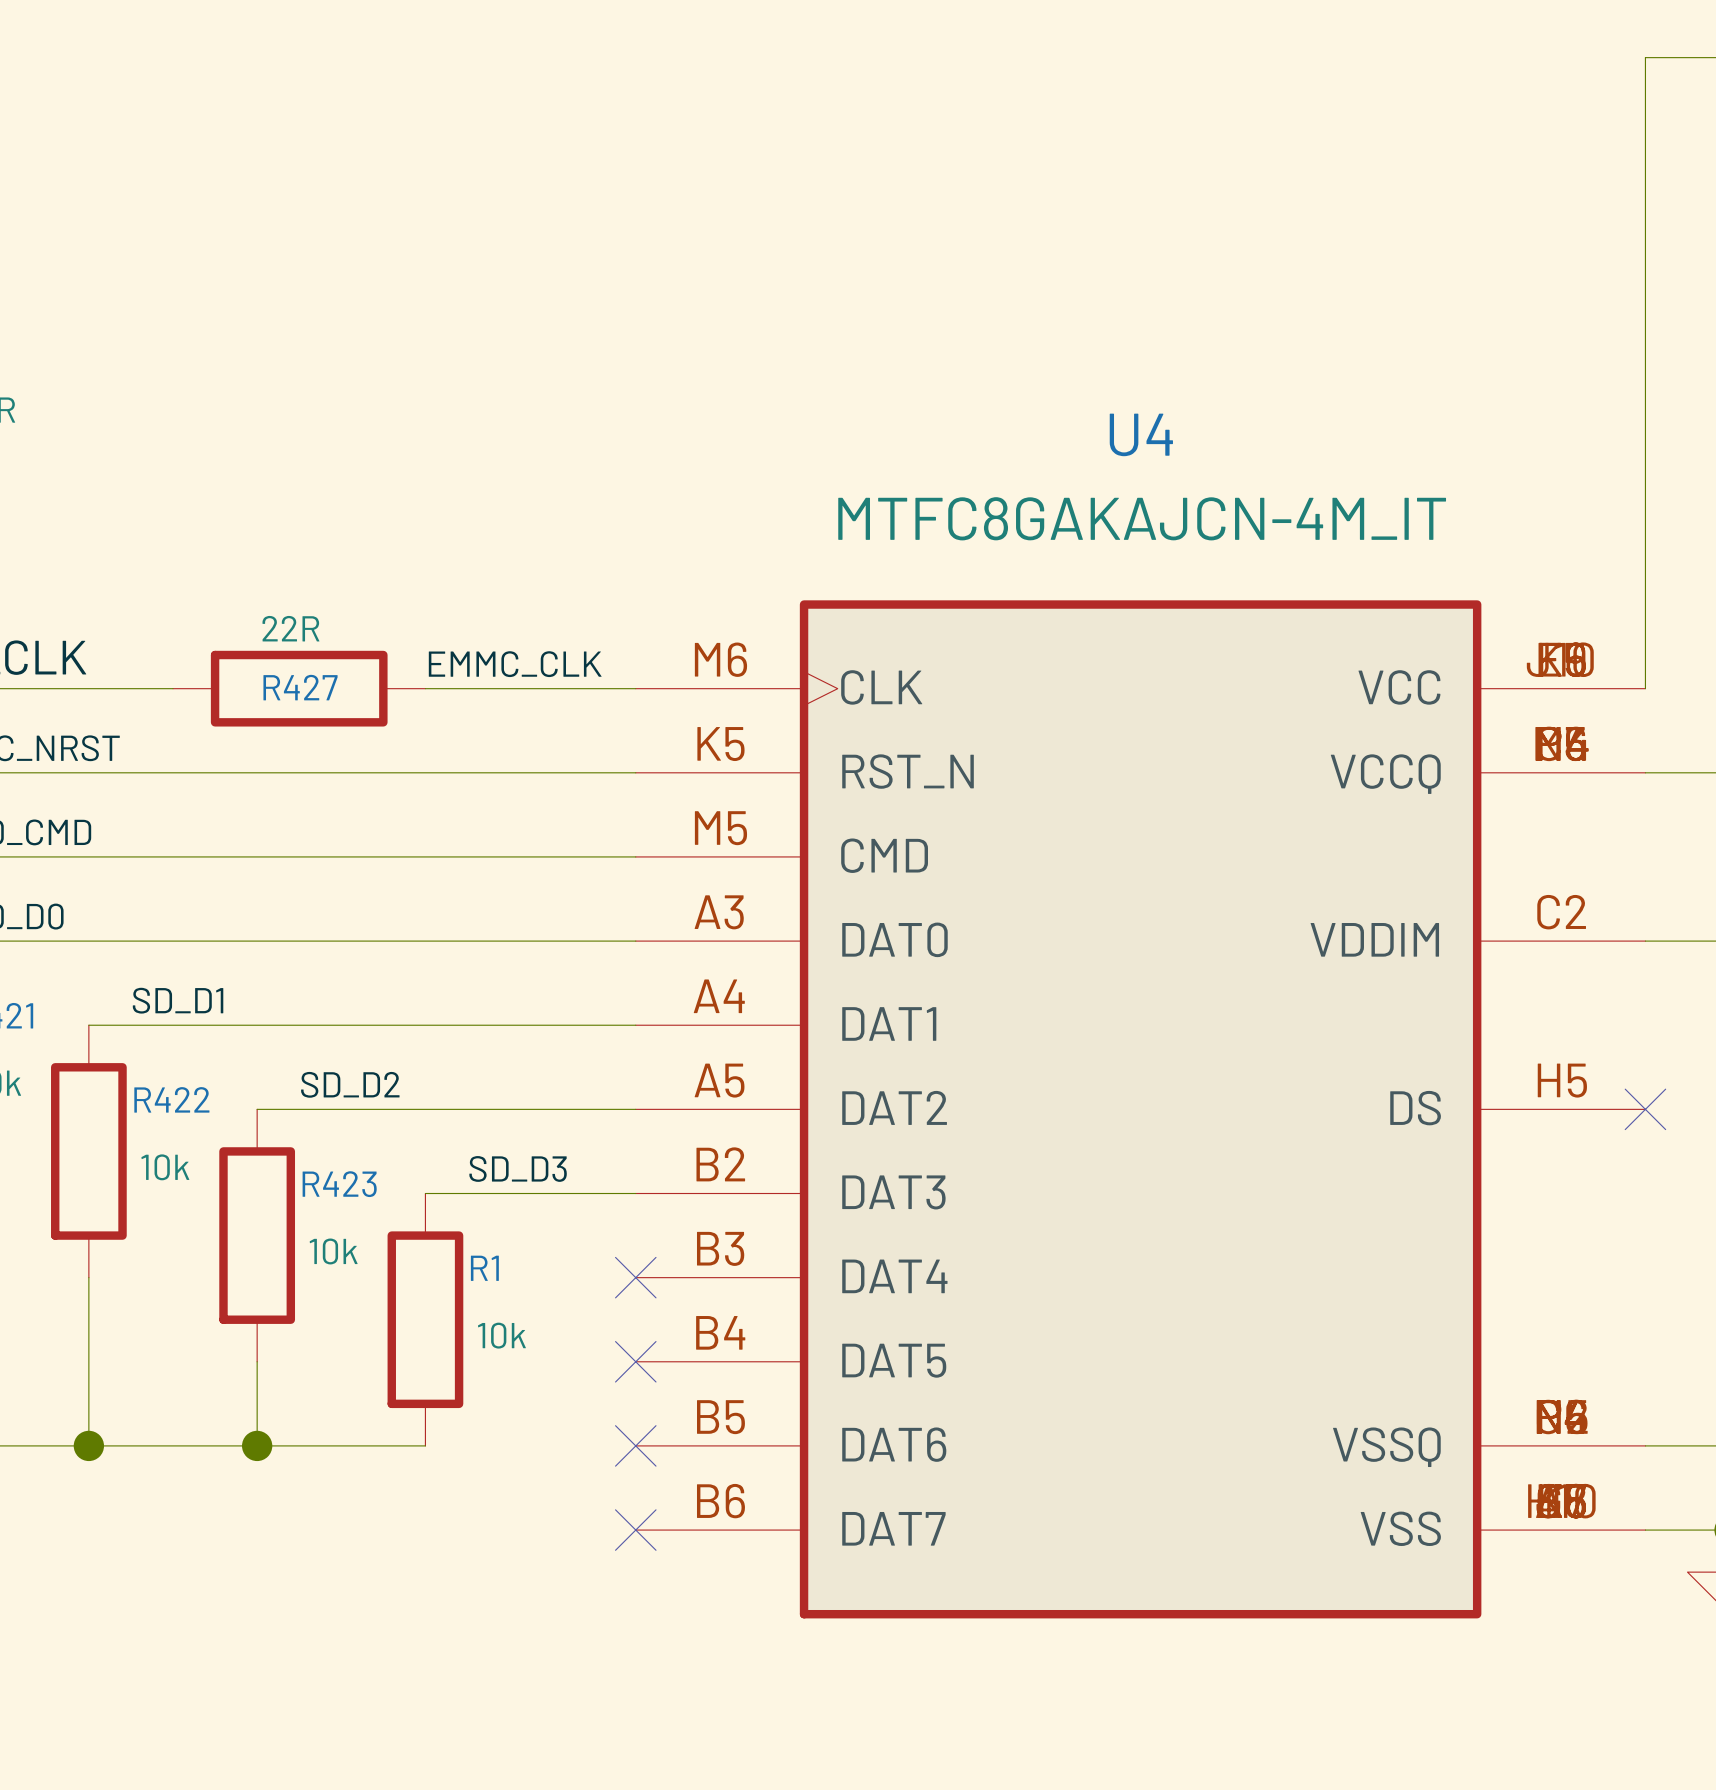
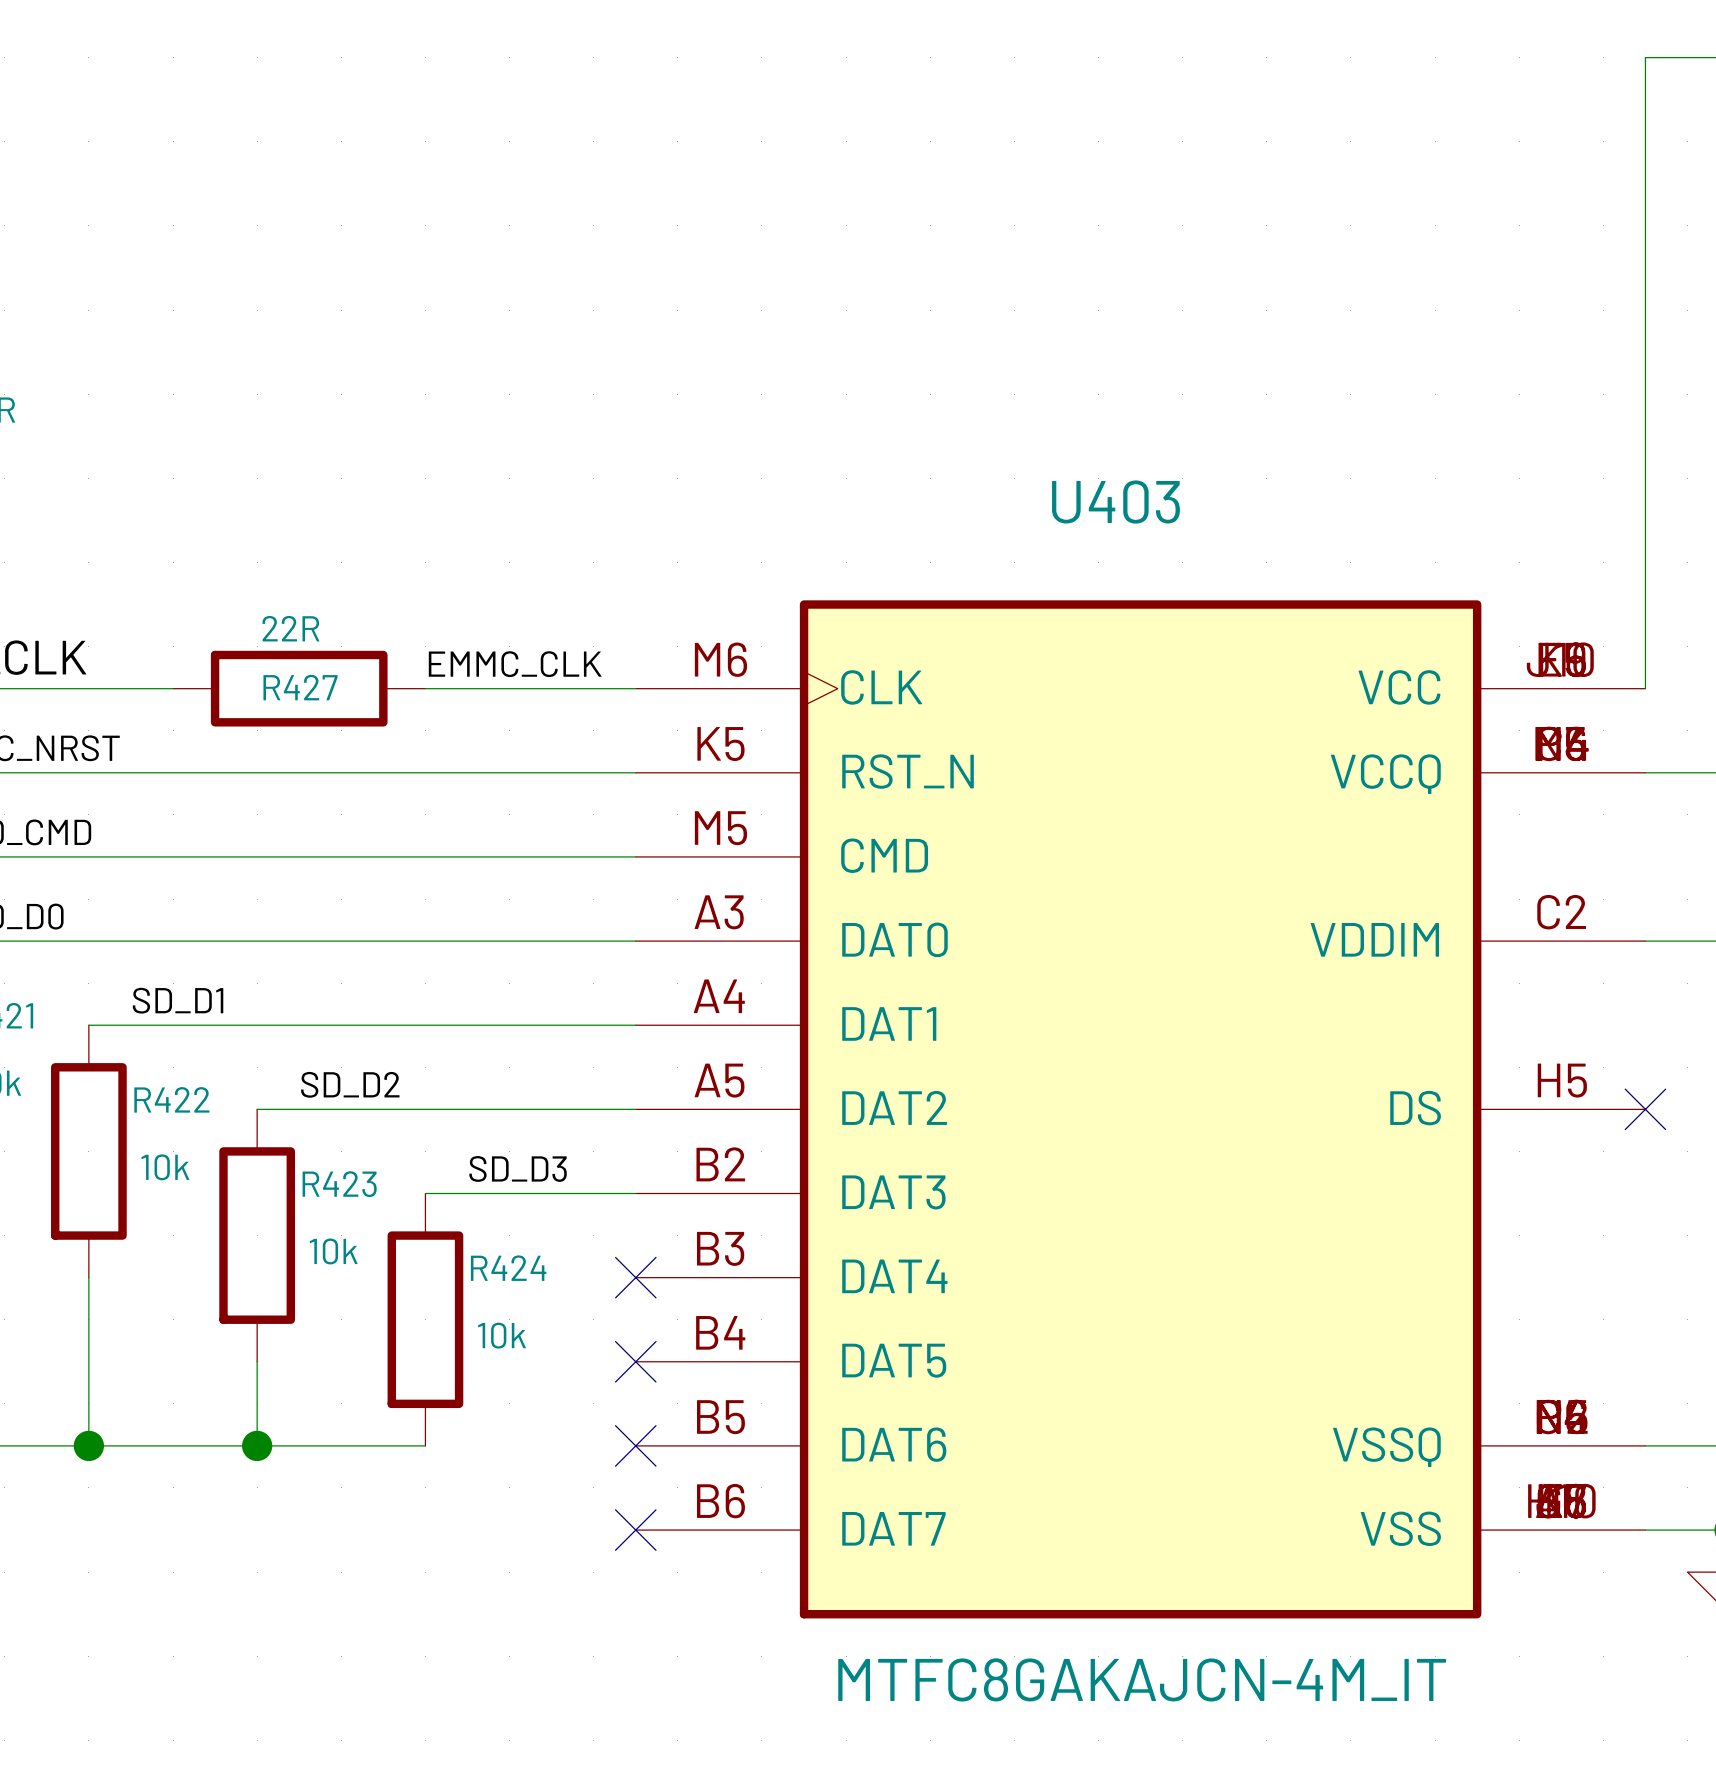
U4 name: U4 (1141, 434) -> U403 (1115, 502)
U4 value position: MTFC8GAKAJCN-4M_IT (1142, 518) -> MTFC8GAKAJCN-4M_IT (1142, 1679)
R1 name: R1 (484, 1268) -> R424 (508, 1268)

